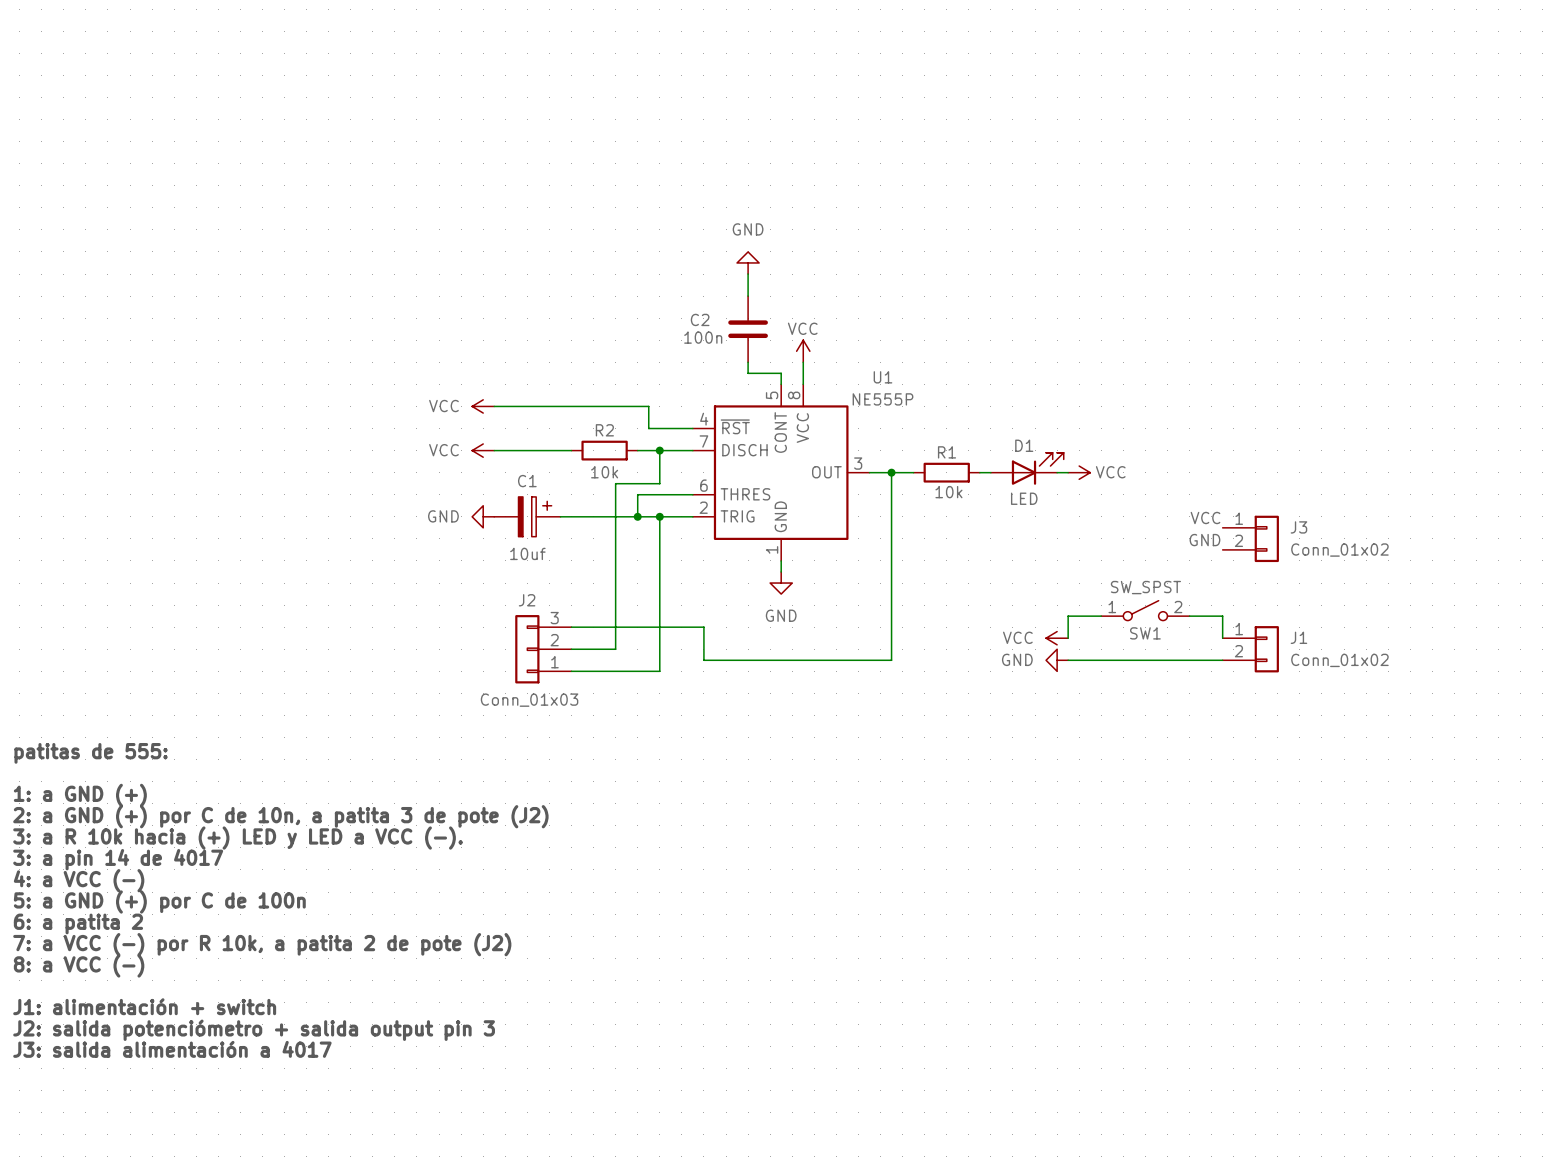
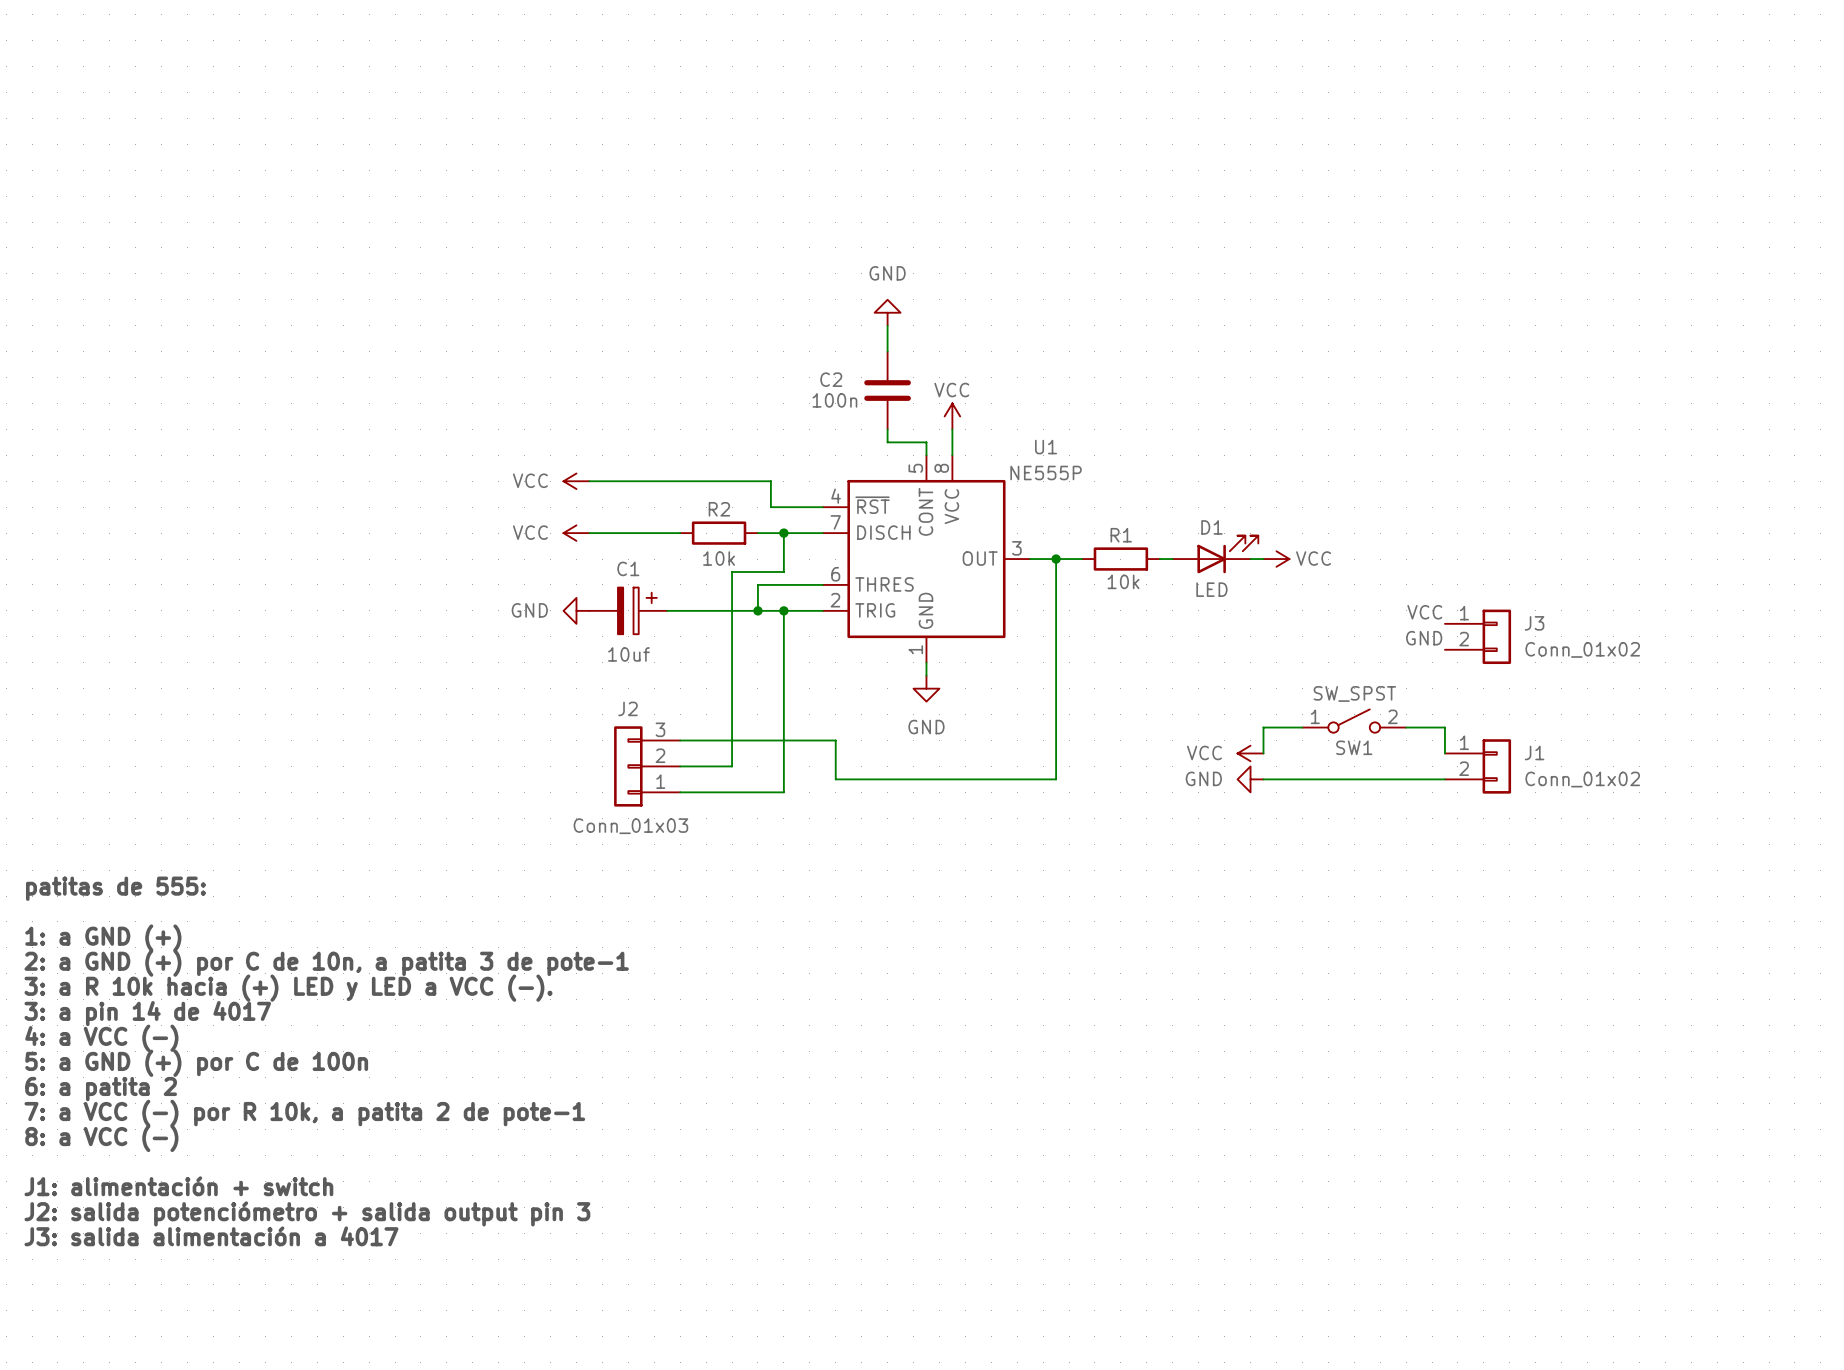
text: 2: a GND (+) por C de 10n, a patita 3 de pote (J2) (280, 816) -> 2: a GND (+) por C de 10n, a patita 3 de pote-1 (326, 963)
text: 7: a VCC (-) por R 10k, a patita 2 de pote (J2) (262, 944) -> 7: a VCC (-) por R 10k, a patita 2 de pote-1 (304, 1113)

